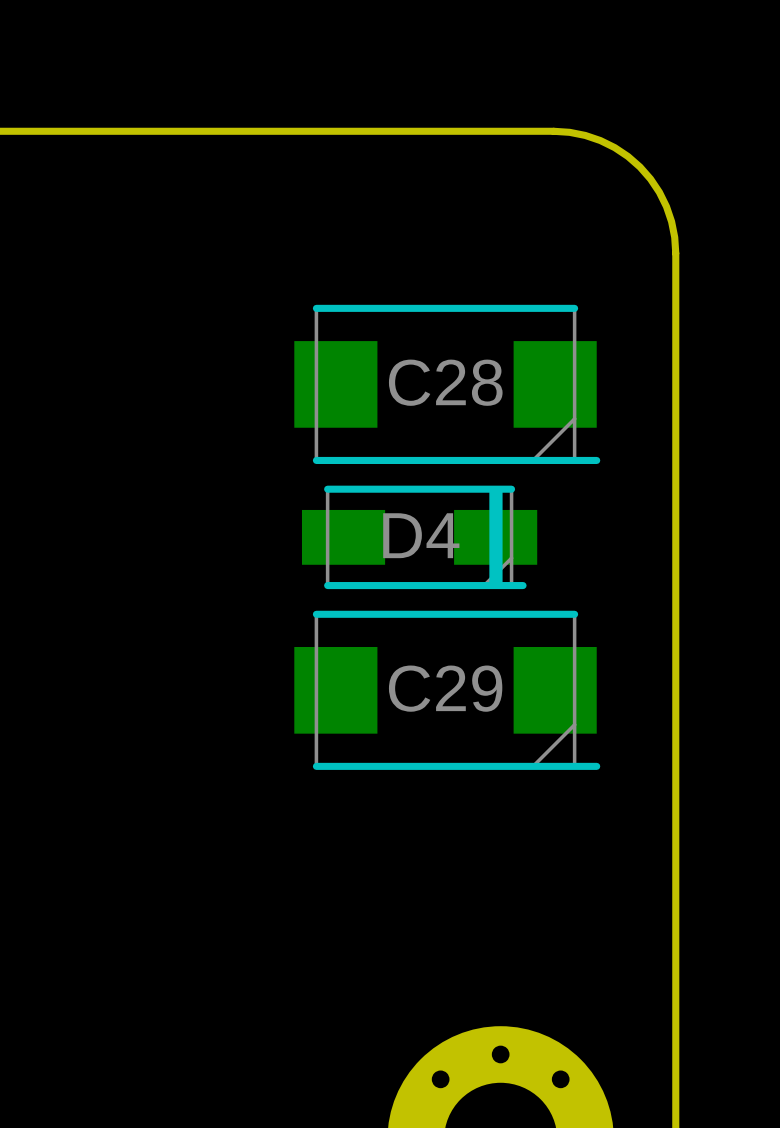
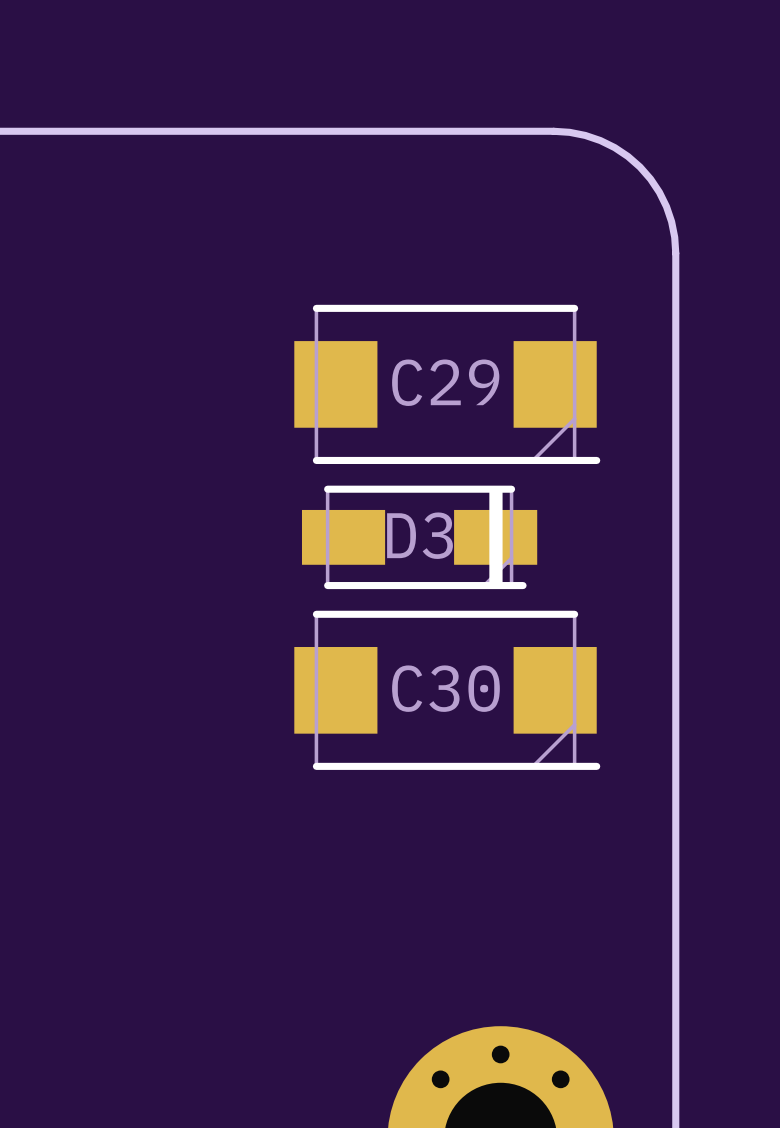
C28 name: C28 (445, 382) -> C29 (445, 382)
D4 name: D4 (421, 535) -> D3 (420, 535)
C29 name: C29 (445, 688) -> C30 (445, 688)

